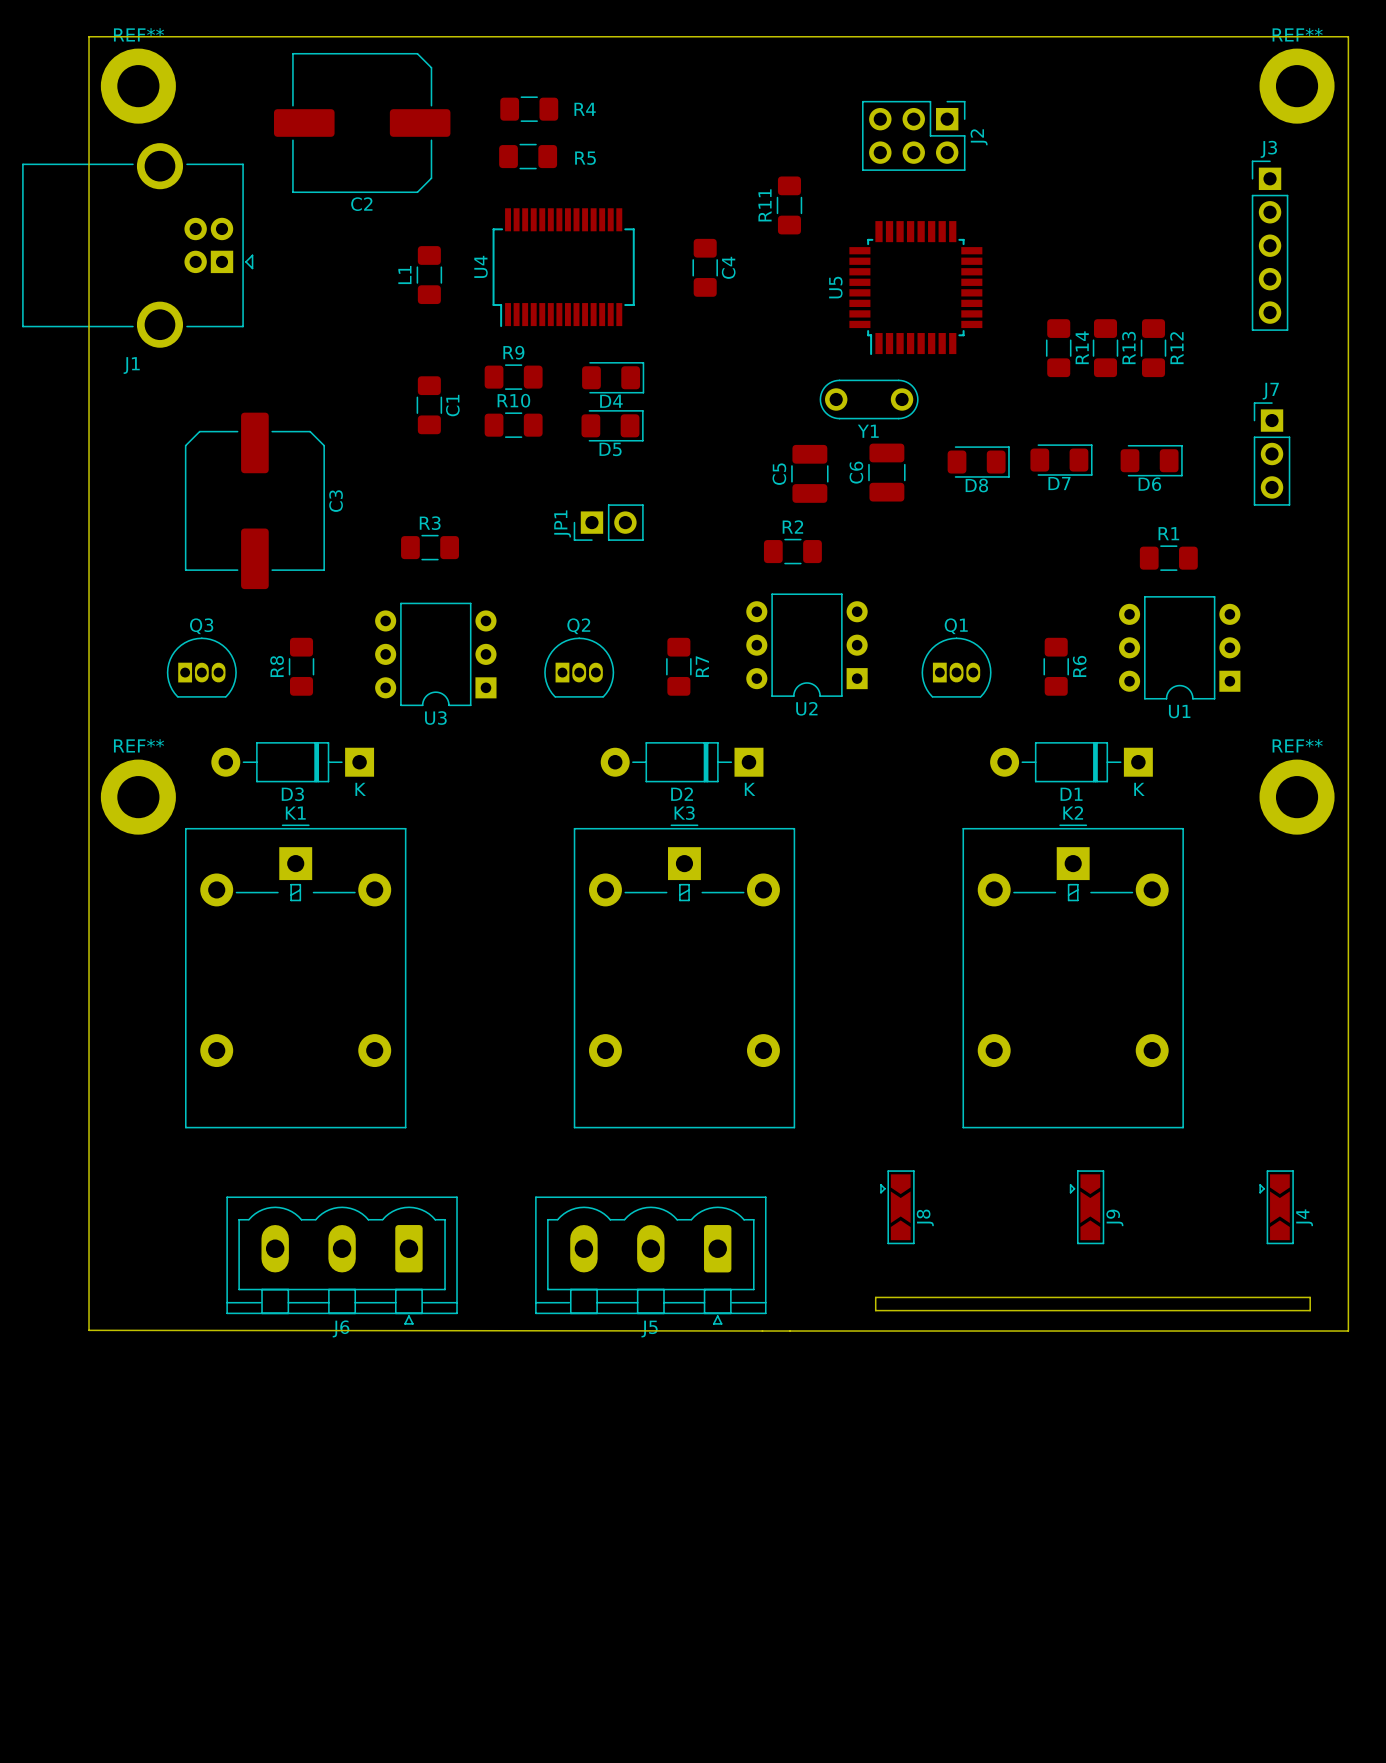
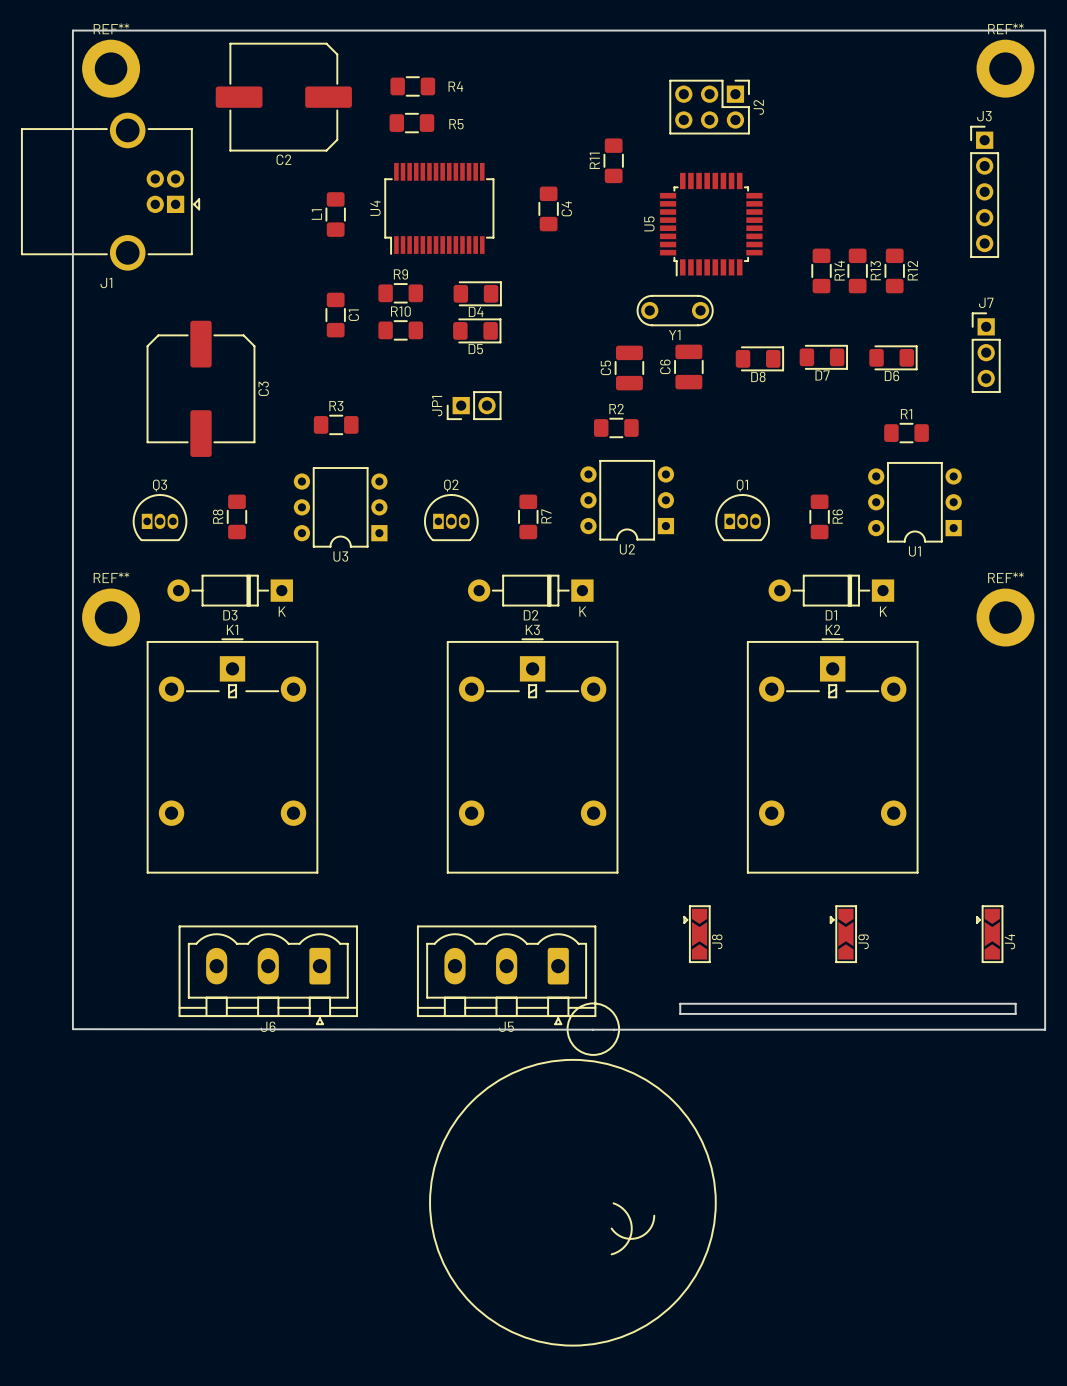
drawing: none -> [429, 1002, 717, 1347]
line: none -> (613, 1203) (627, 1213) (631, 1229) (625, 1245) (611, 1254)
line: none -> (654, 1215) (649, 1229) (637, 1237) (623, 1237) (611, 1228)

